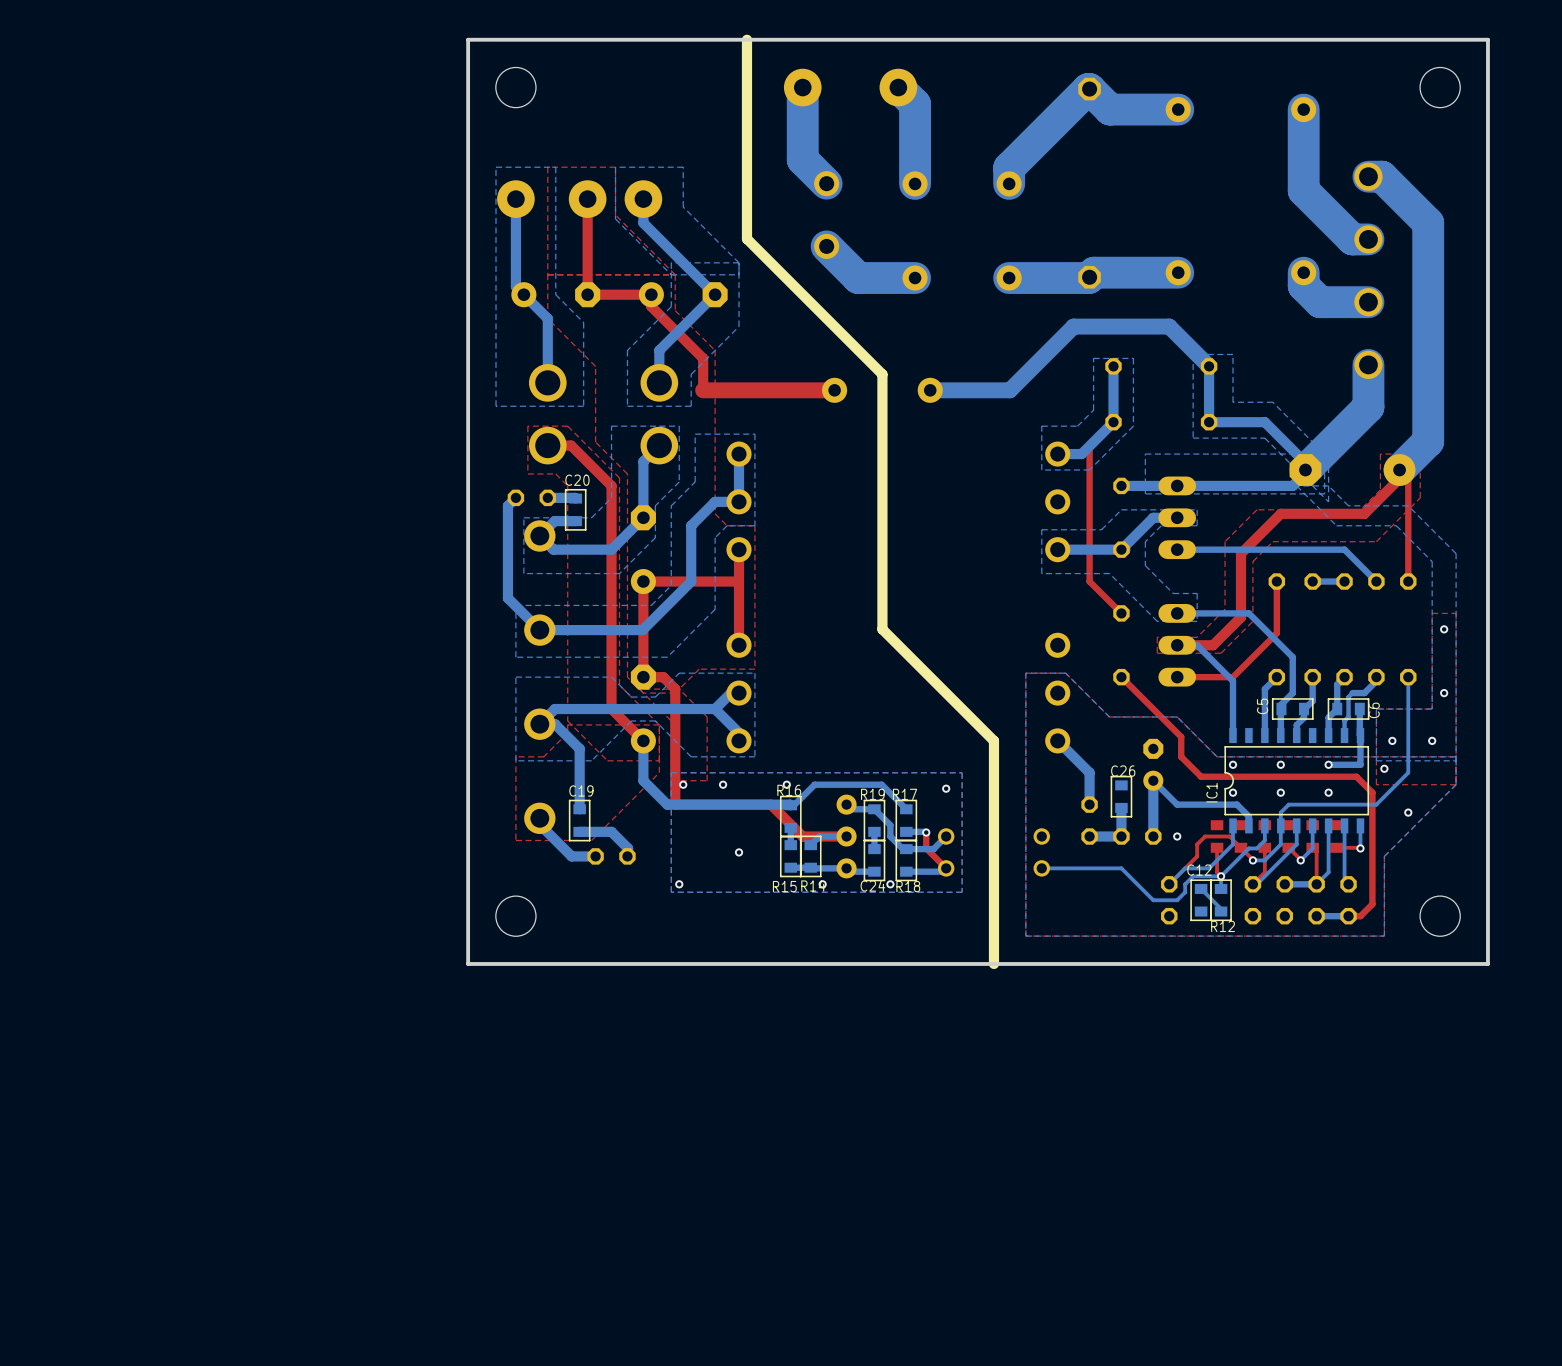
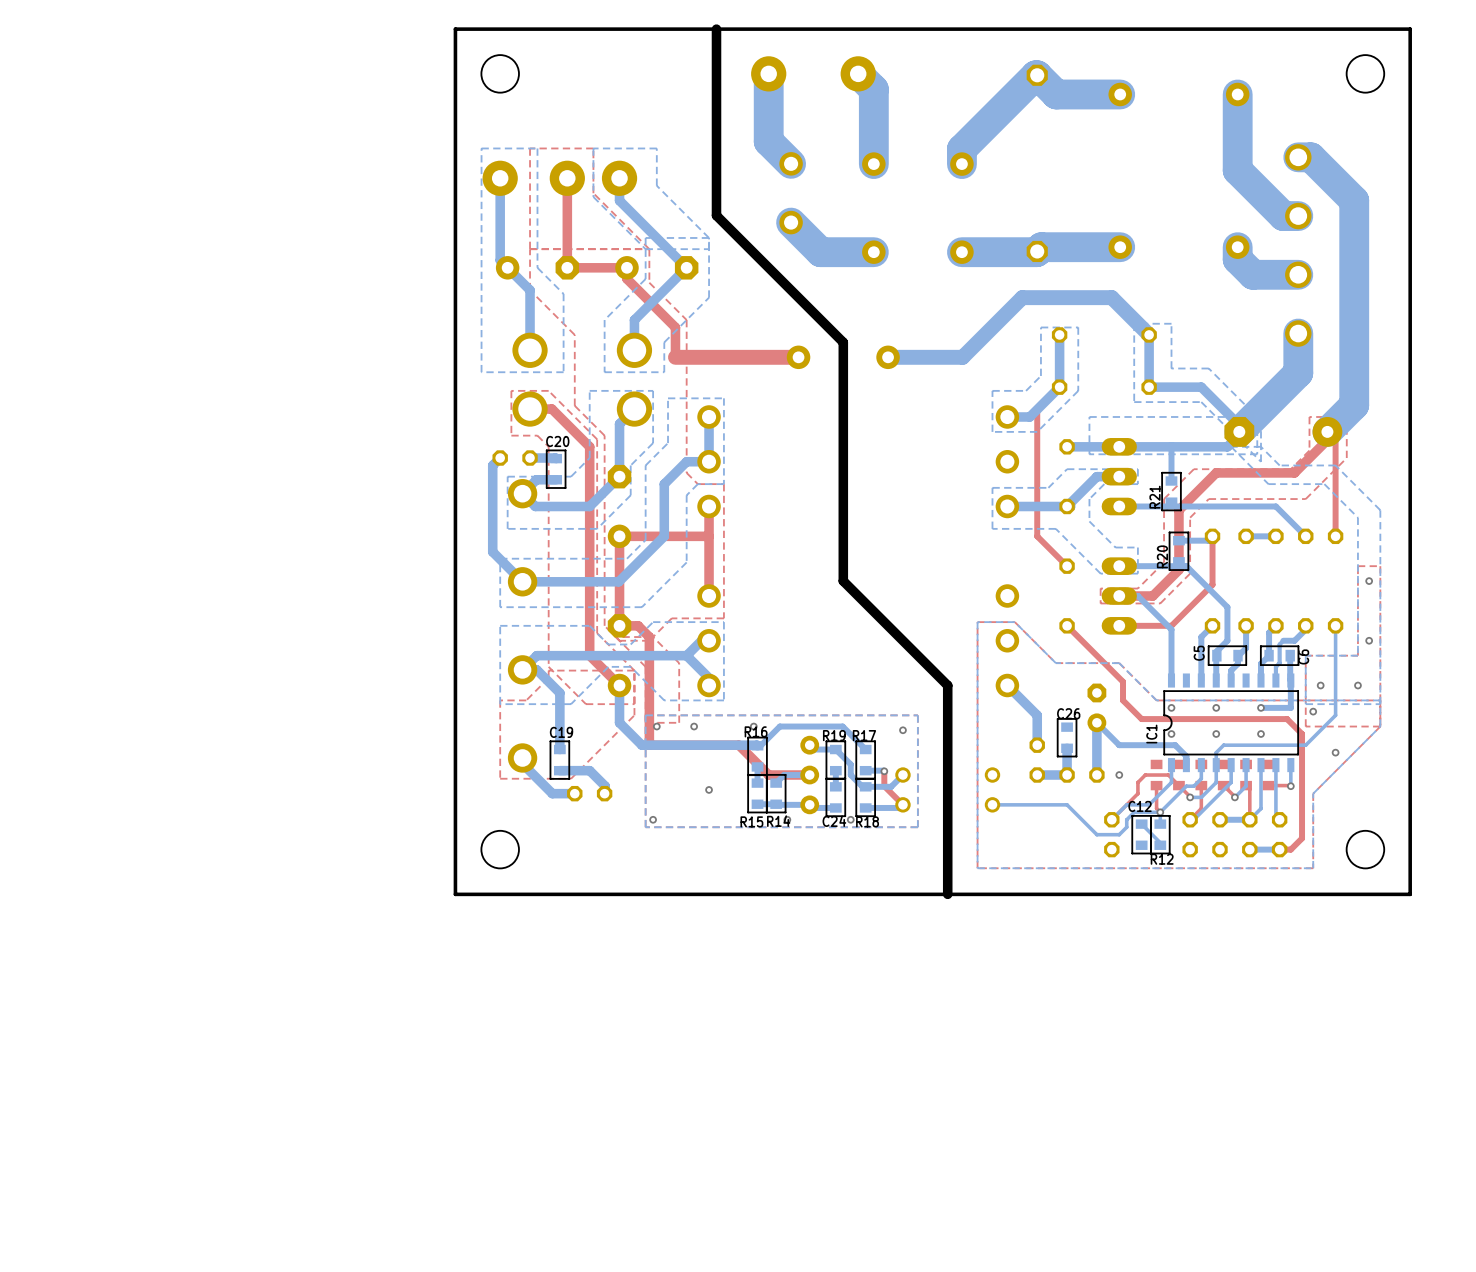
bottom track: none -> (1171, 446) (1171, 481)
R21: none -> (1171, 491)
bottom track: none -> (1212, 536) (1208, 540) (1178, 540)
R20: none -> (1178, 551)

